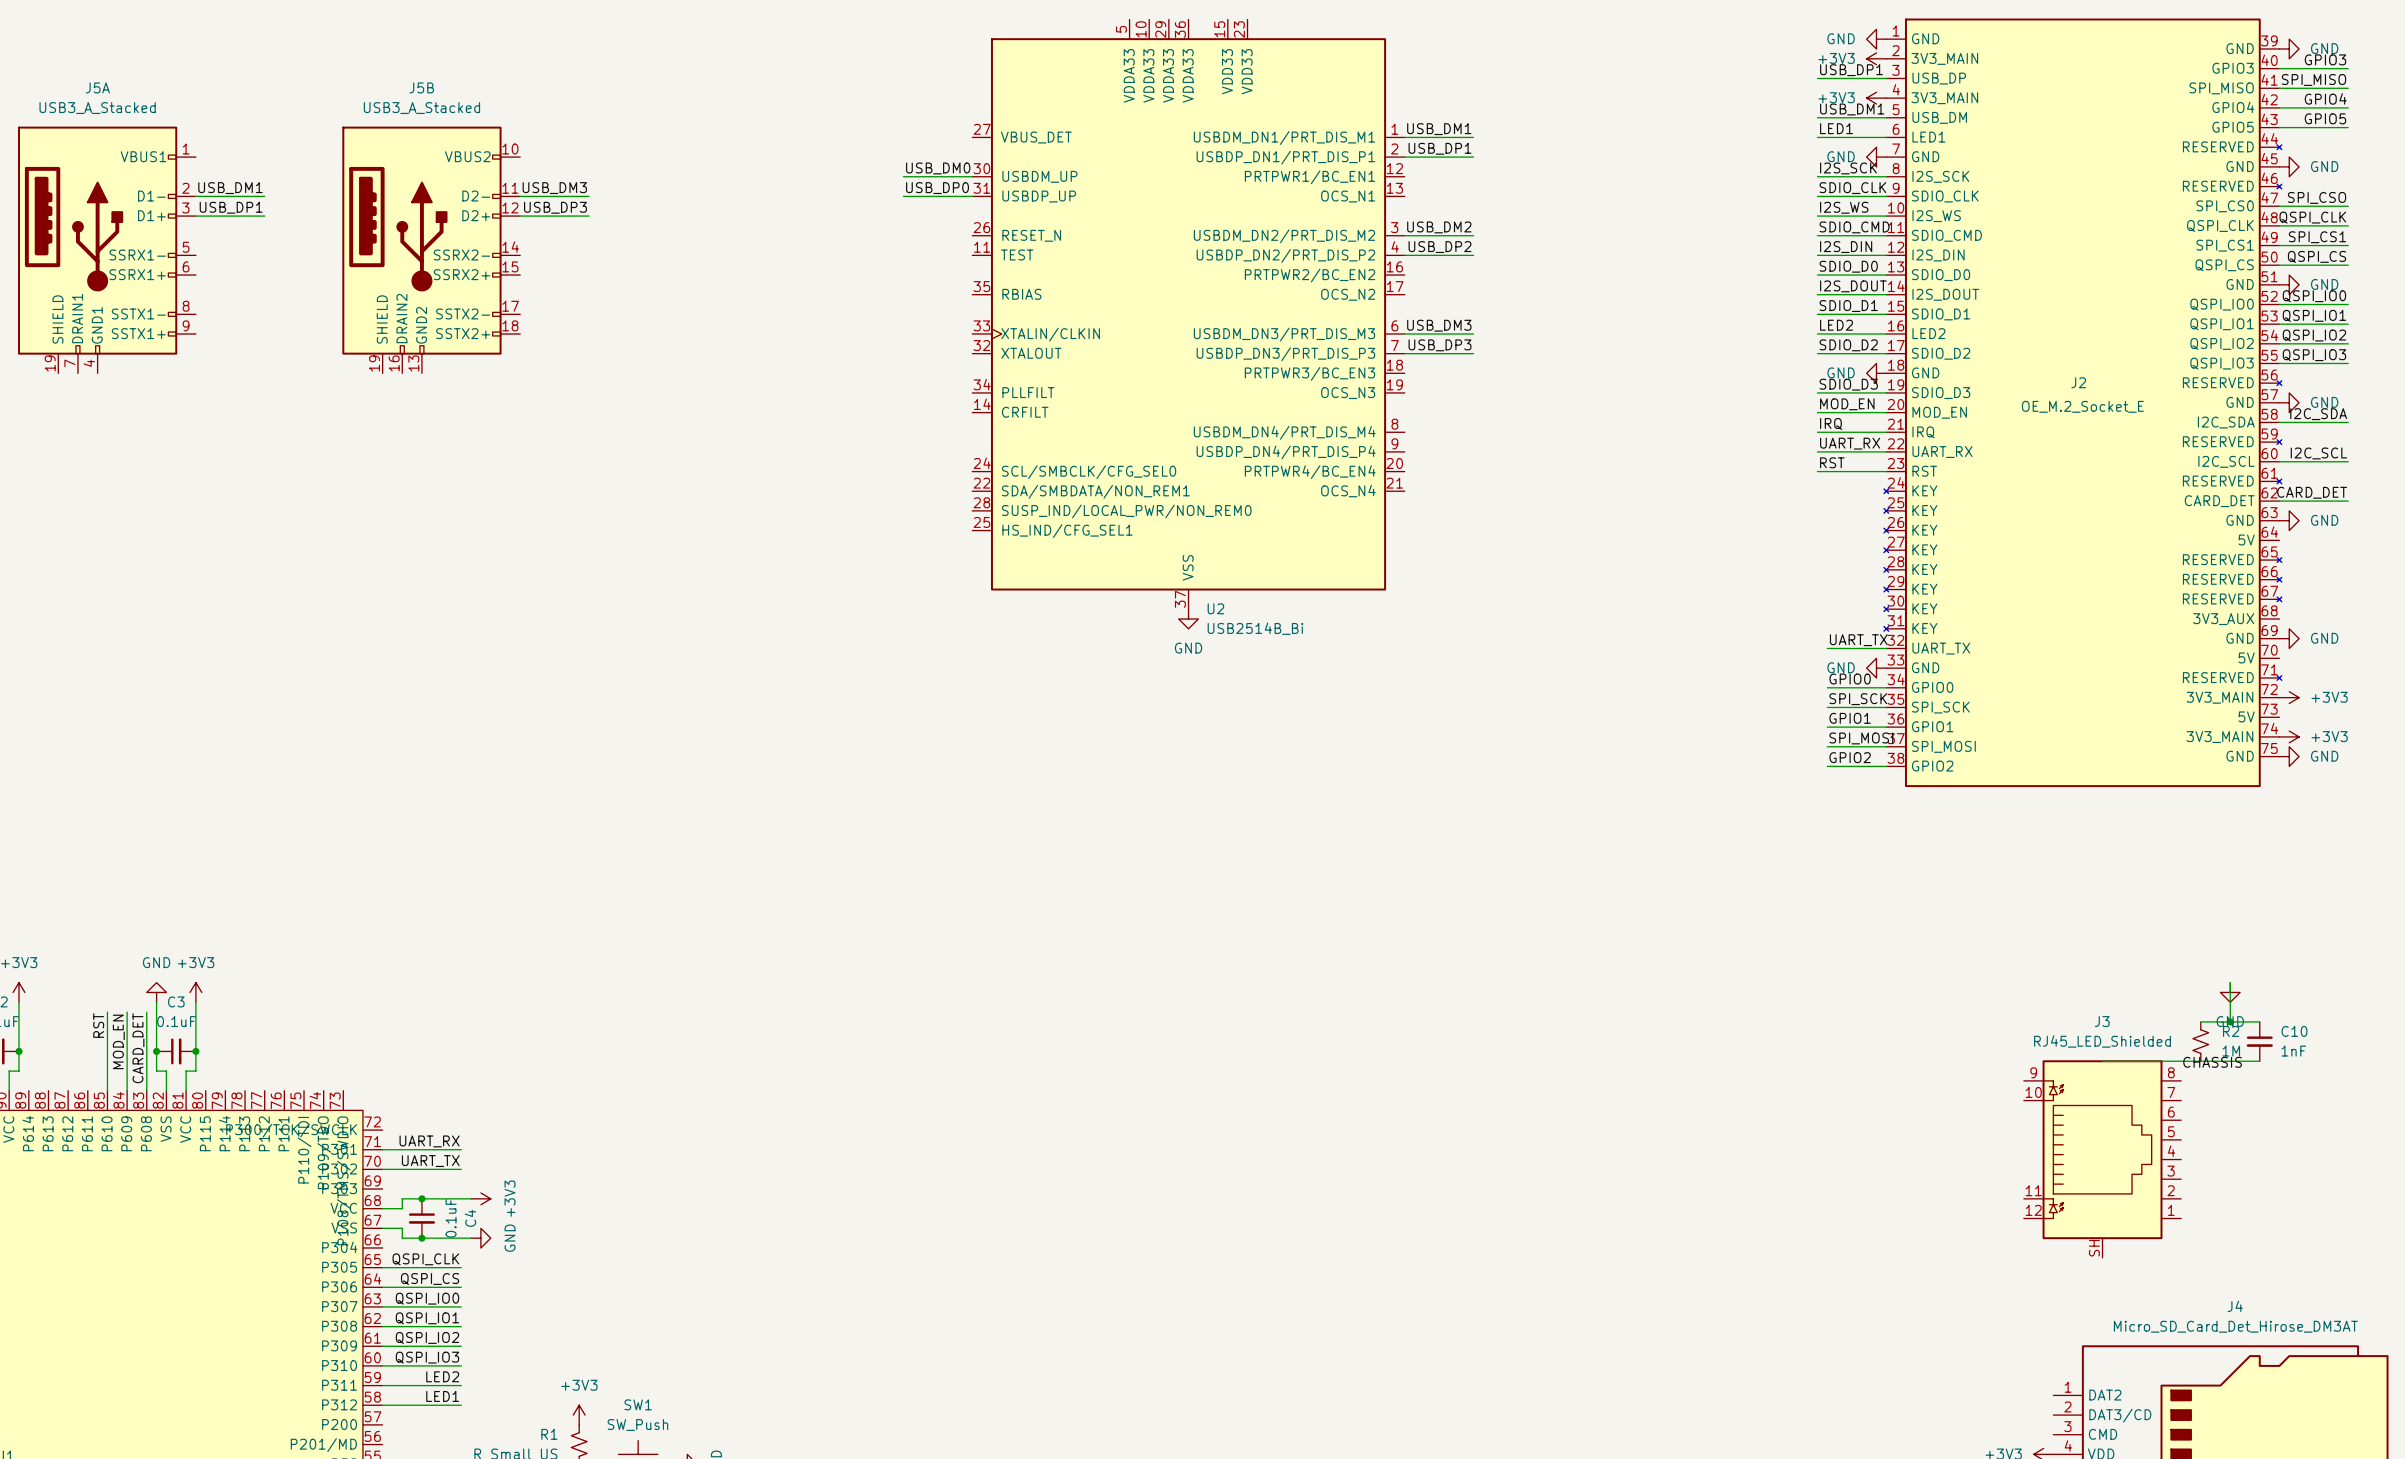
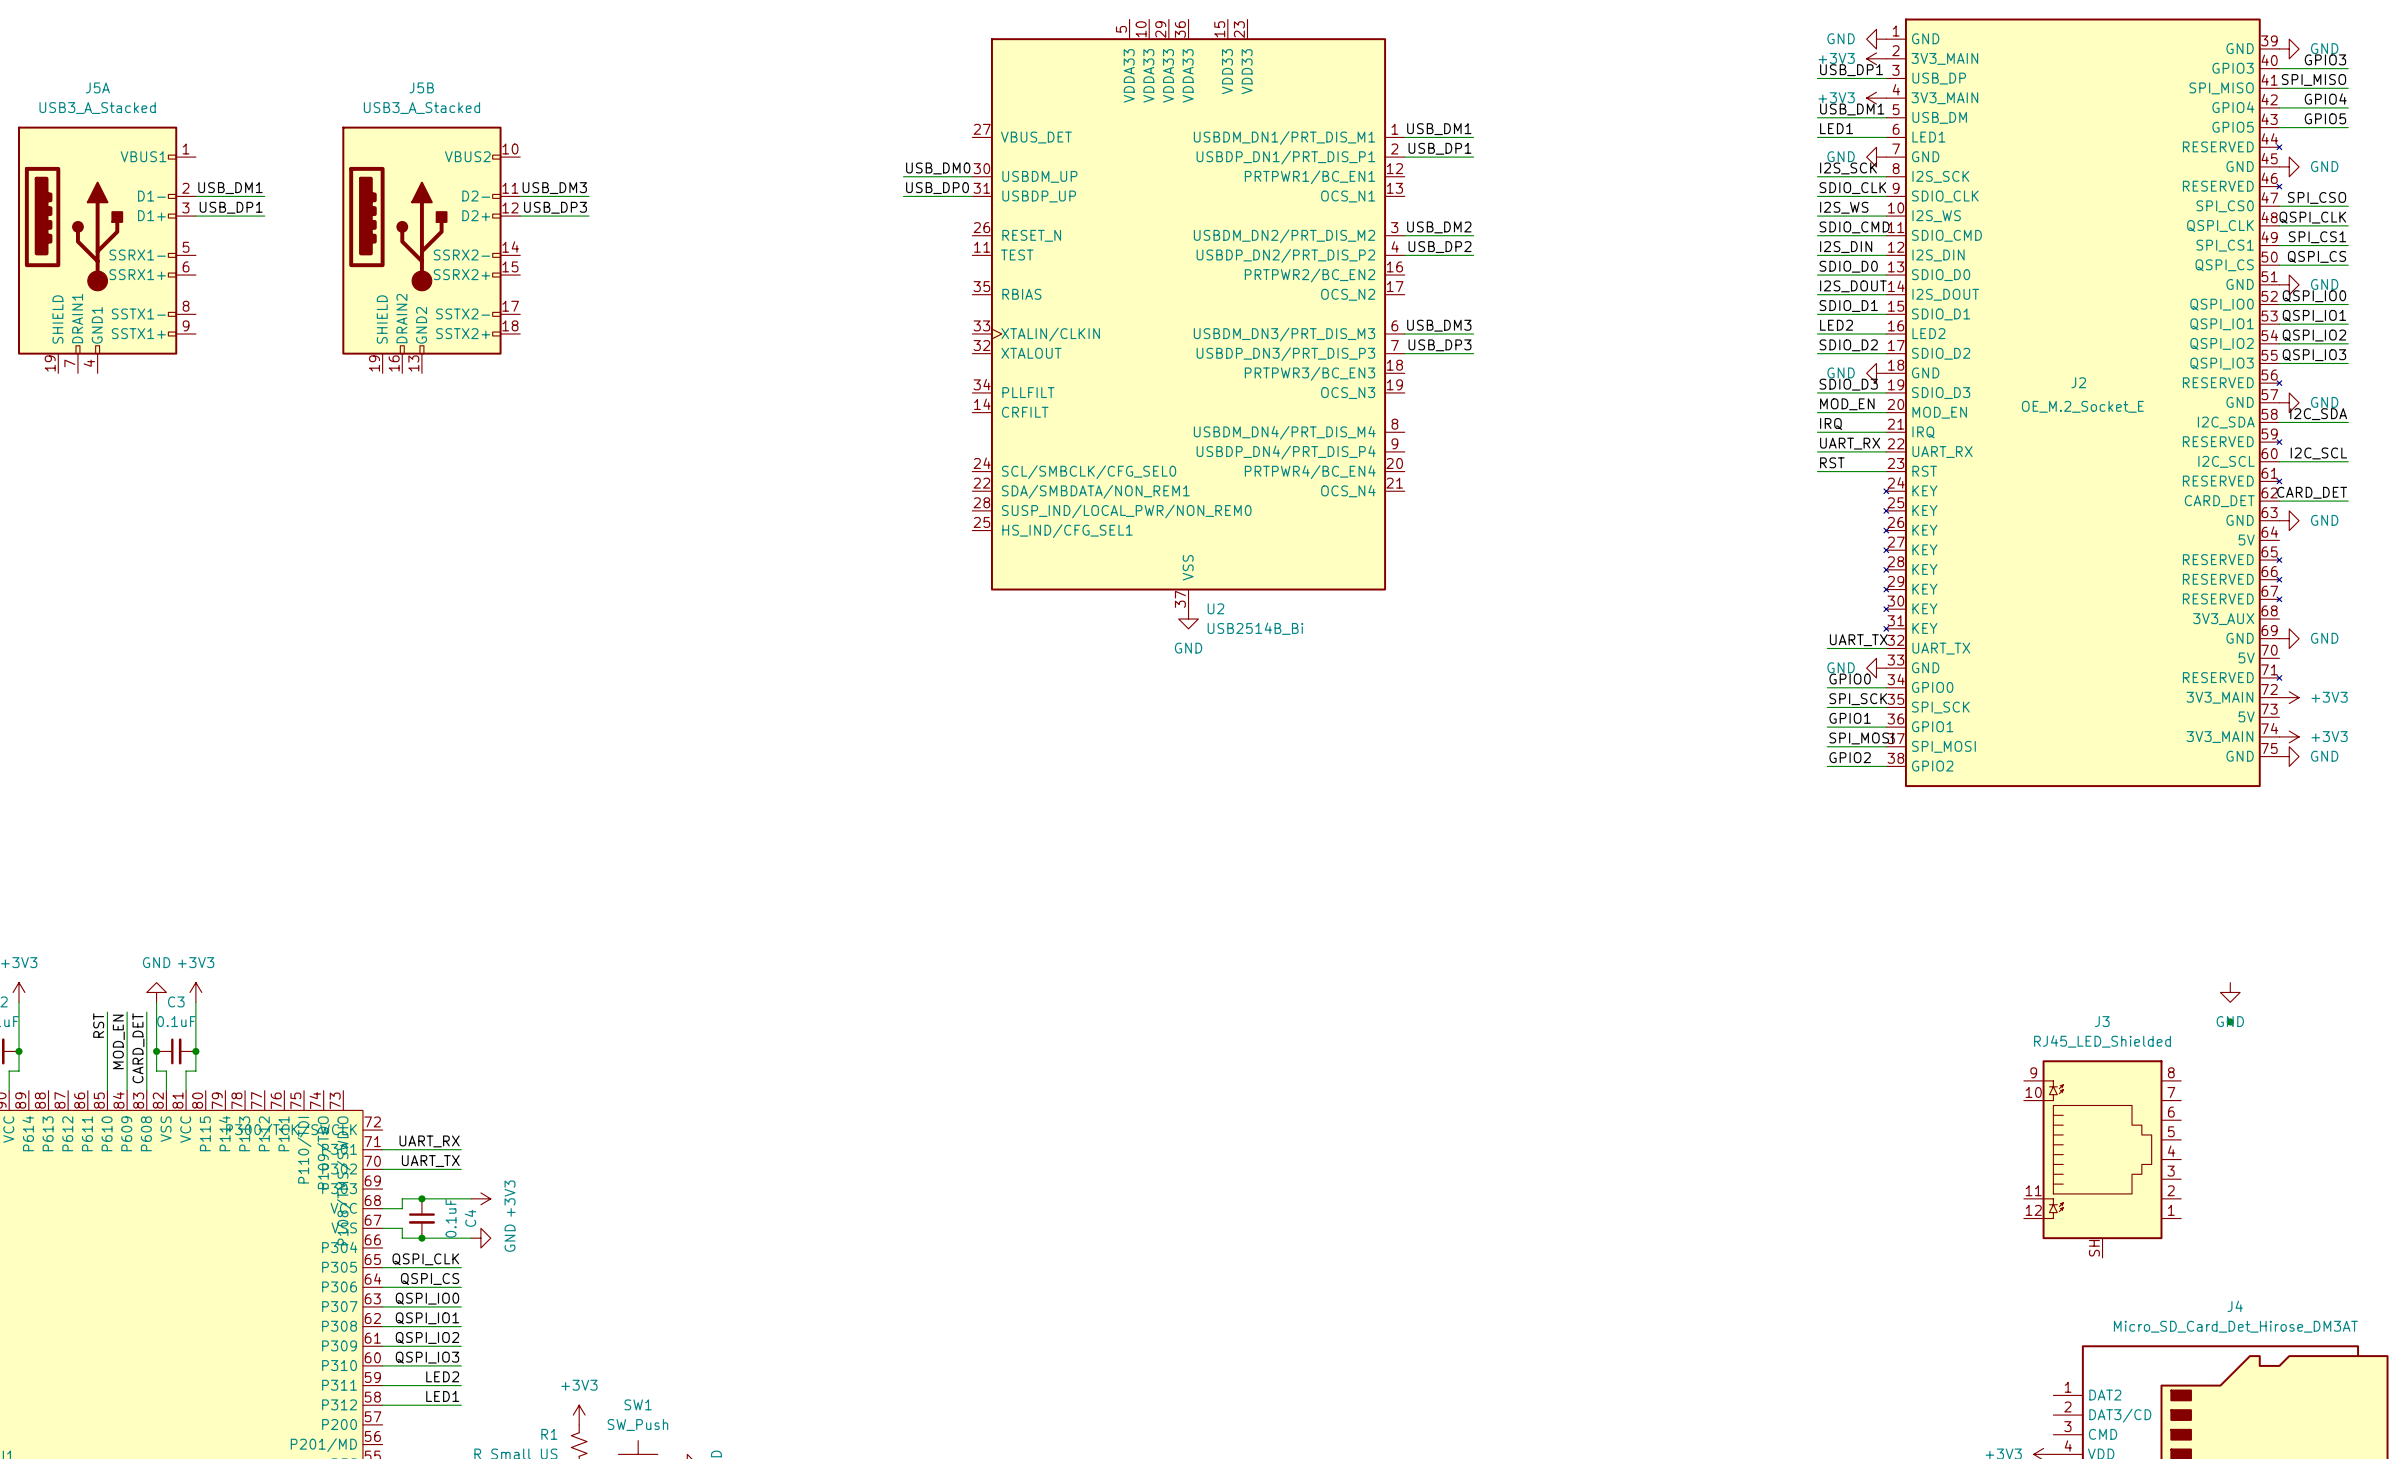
wire: (2230, 982) (2230, 1021) -> none
wire: (2200, 1021) (2259, 1021) -> none
R2: 1M (2200, 1041) -> none
C10: 1nF (2259, 1041) -> none
wire: (2102, 1061) (2259, 1061) -> none
label: CHASSIS (2212, 1062) -> none

